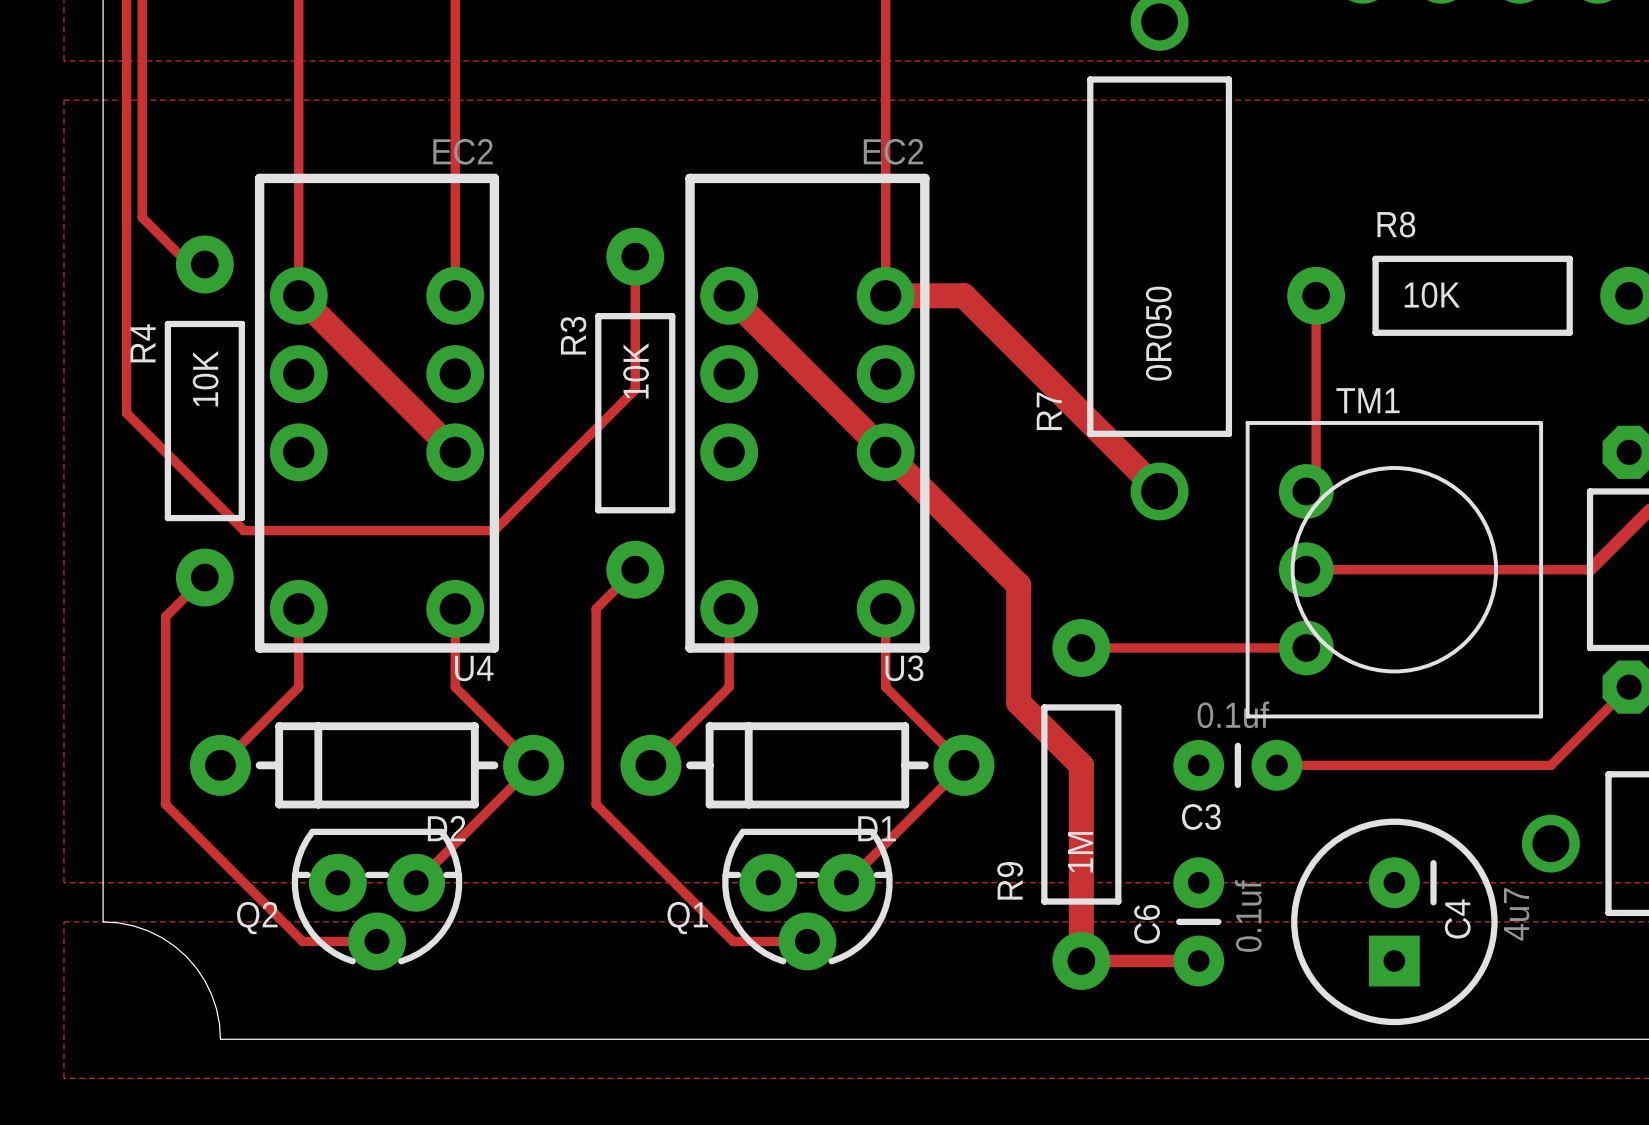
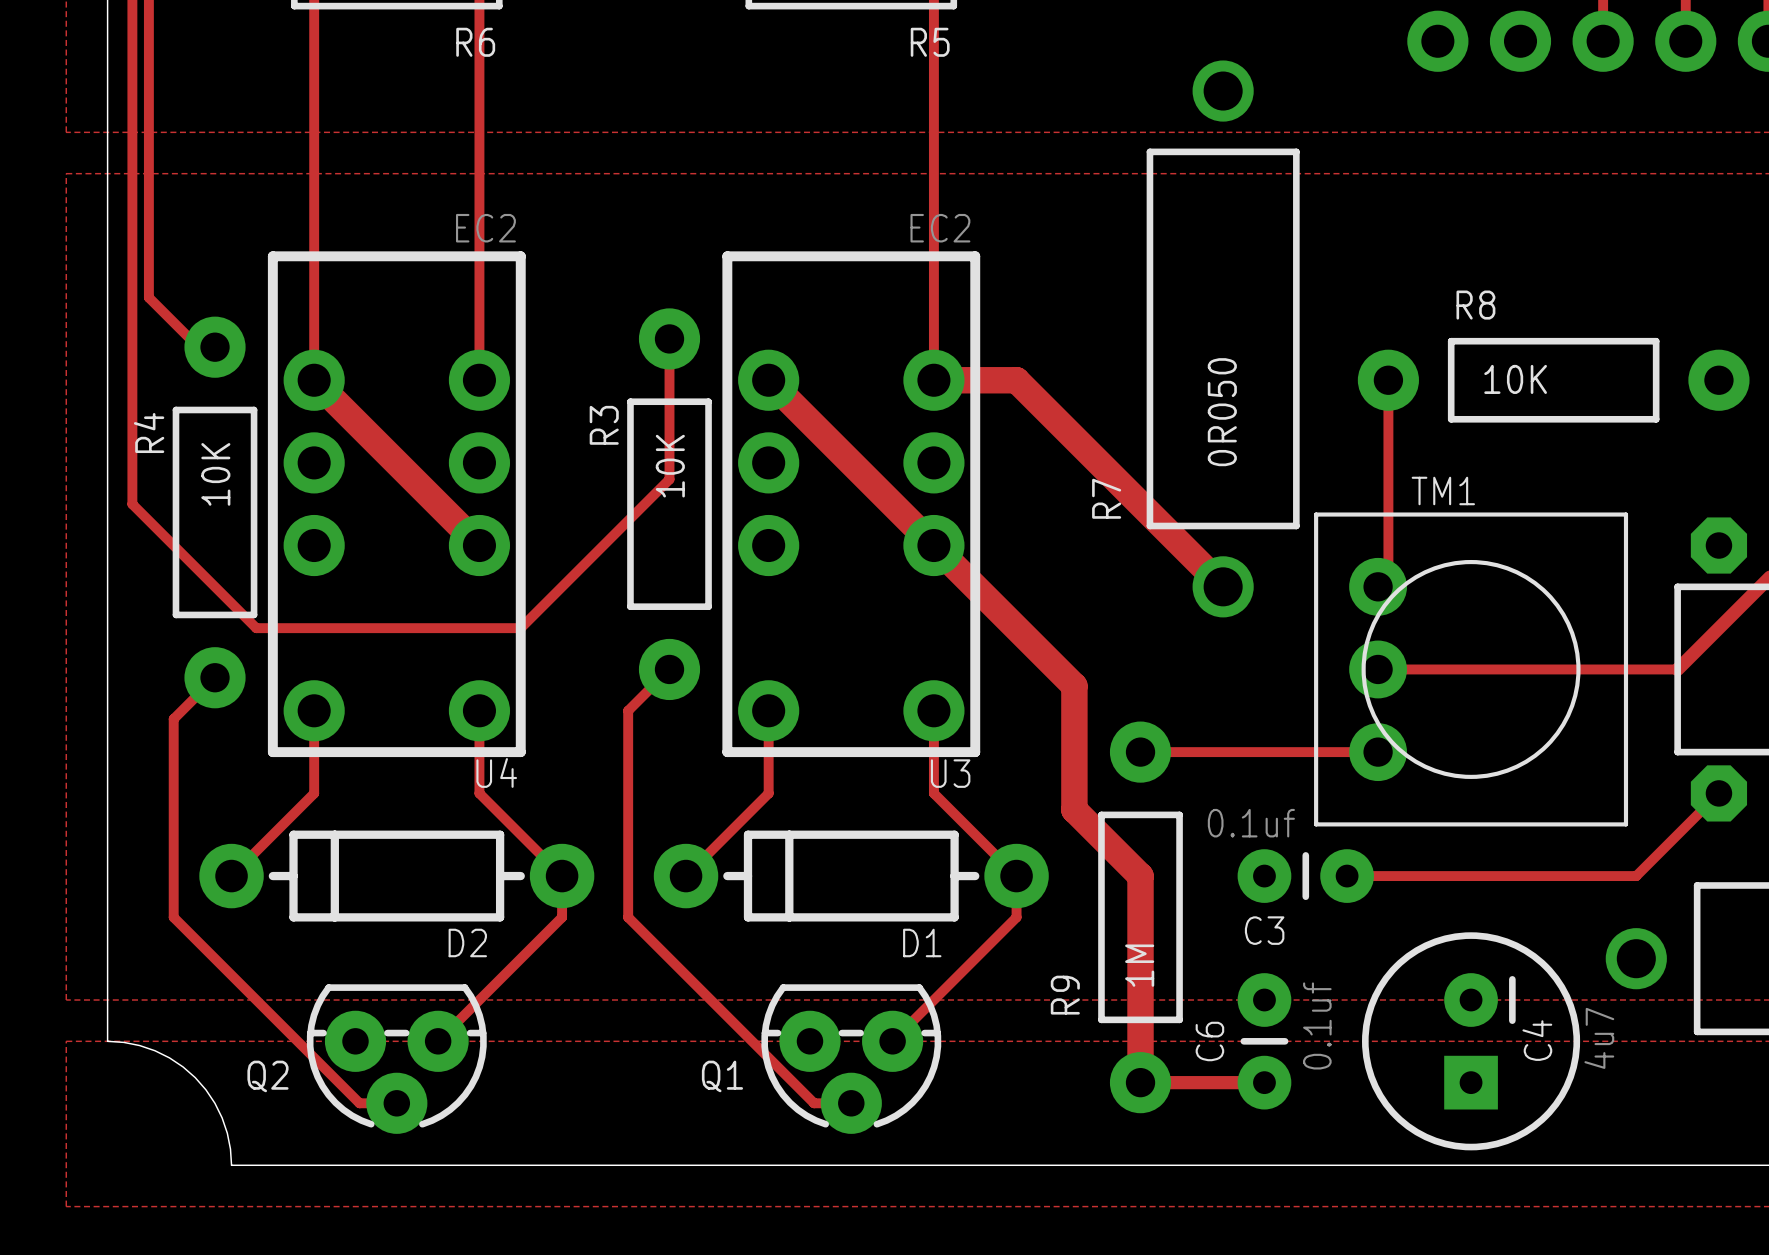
C3 value position: 0.1uf (1233, 714) -> 0.1uf (1251, 823)
track: (533, 765) (416, 882) -> (562, 876) (562, 917) (438, 1041)
track: (963, 765) (846, 882) -> (1016, 876) (1016, 917) (892, 1041)
Q2 position: (377, 899) -> (396, 1059)
Q1 position: (807, 899) -> (851, 1059)
track: (302, 941) (377, 941) -> (318, 1061) (359, 1103) (396, 1103)
track: (733, 941) (807, 941) -> (772, 1061) (814, 1103) (851, 1103)

